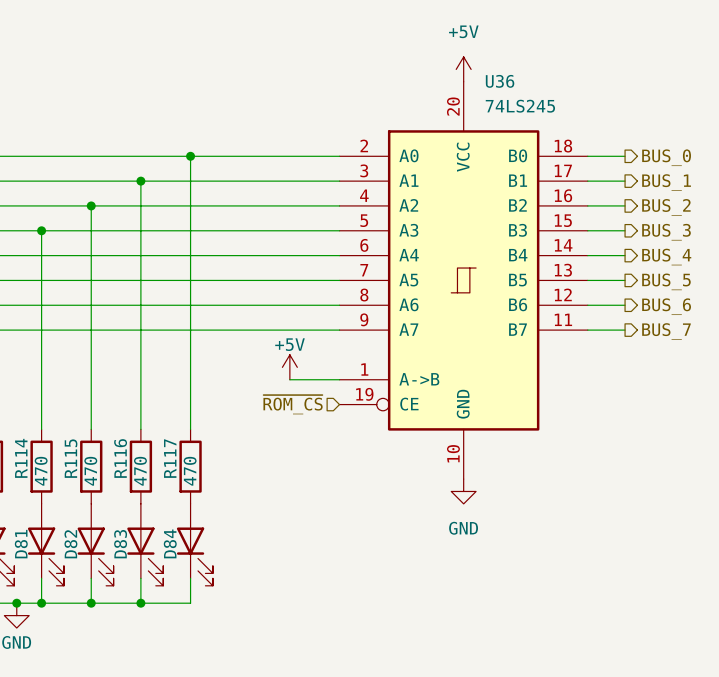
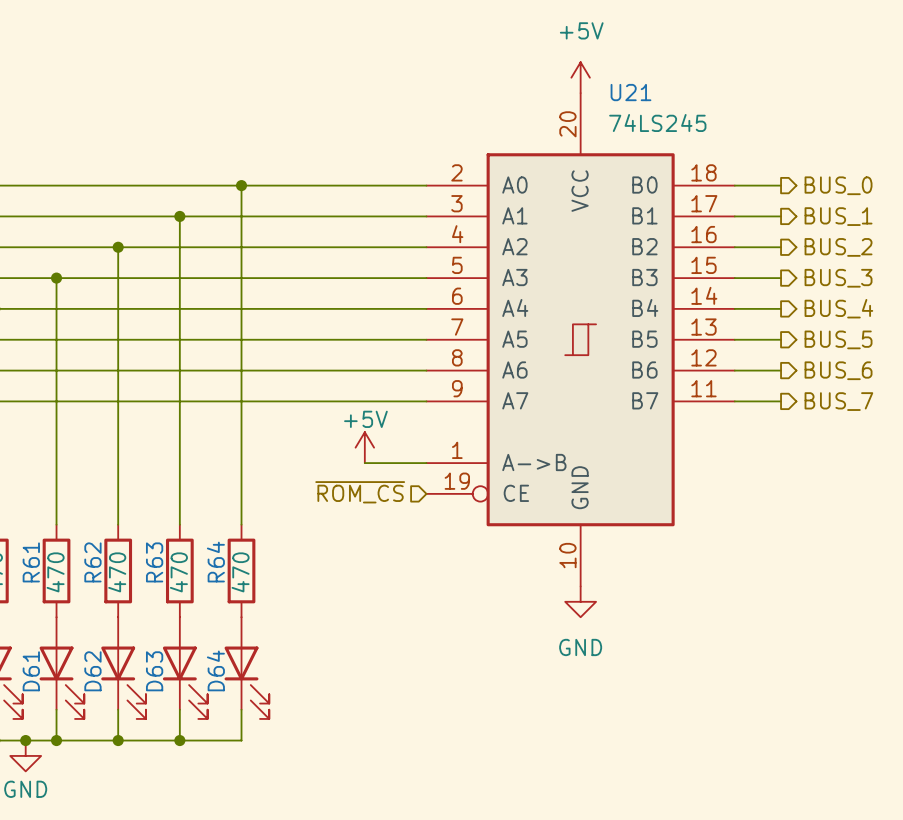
U36 name: U36 (500, 81) -> U21 (630, 92)
R114 name: R114 (21, 458) -> R61 (31, 562)
R115 name: R115 (71, 458) -> R62 (92, 562)
R116 name: R116 (120, 458) -> R63 (154, 562)
R117 name: R117 (170, 458) -> R64 (215, 562)
D84 name: D84 (170, 543) -> D64 (215, 670)
D81 name: D81 (21, 544) -> D61 (31, 671)
D82 name: D82 (70, 544) -> D62 (92, 671)
D83 name: D83 (120, 544) -> D63 (154, 671)

